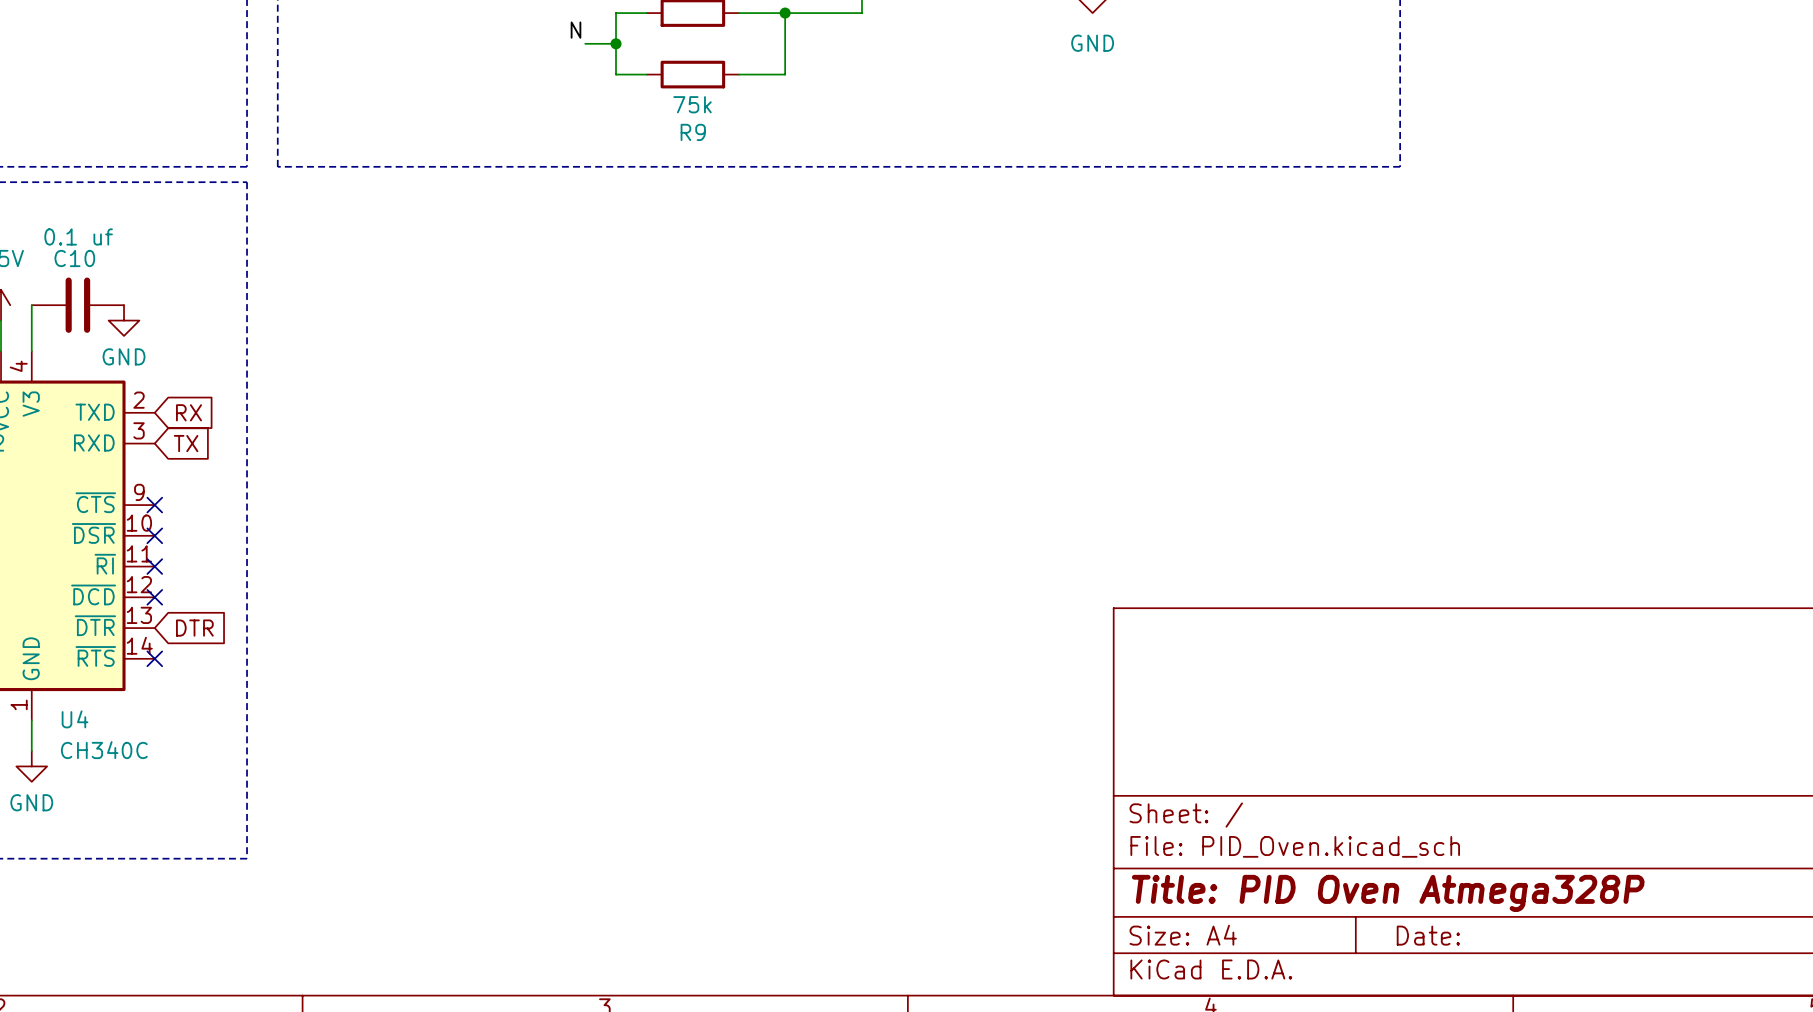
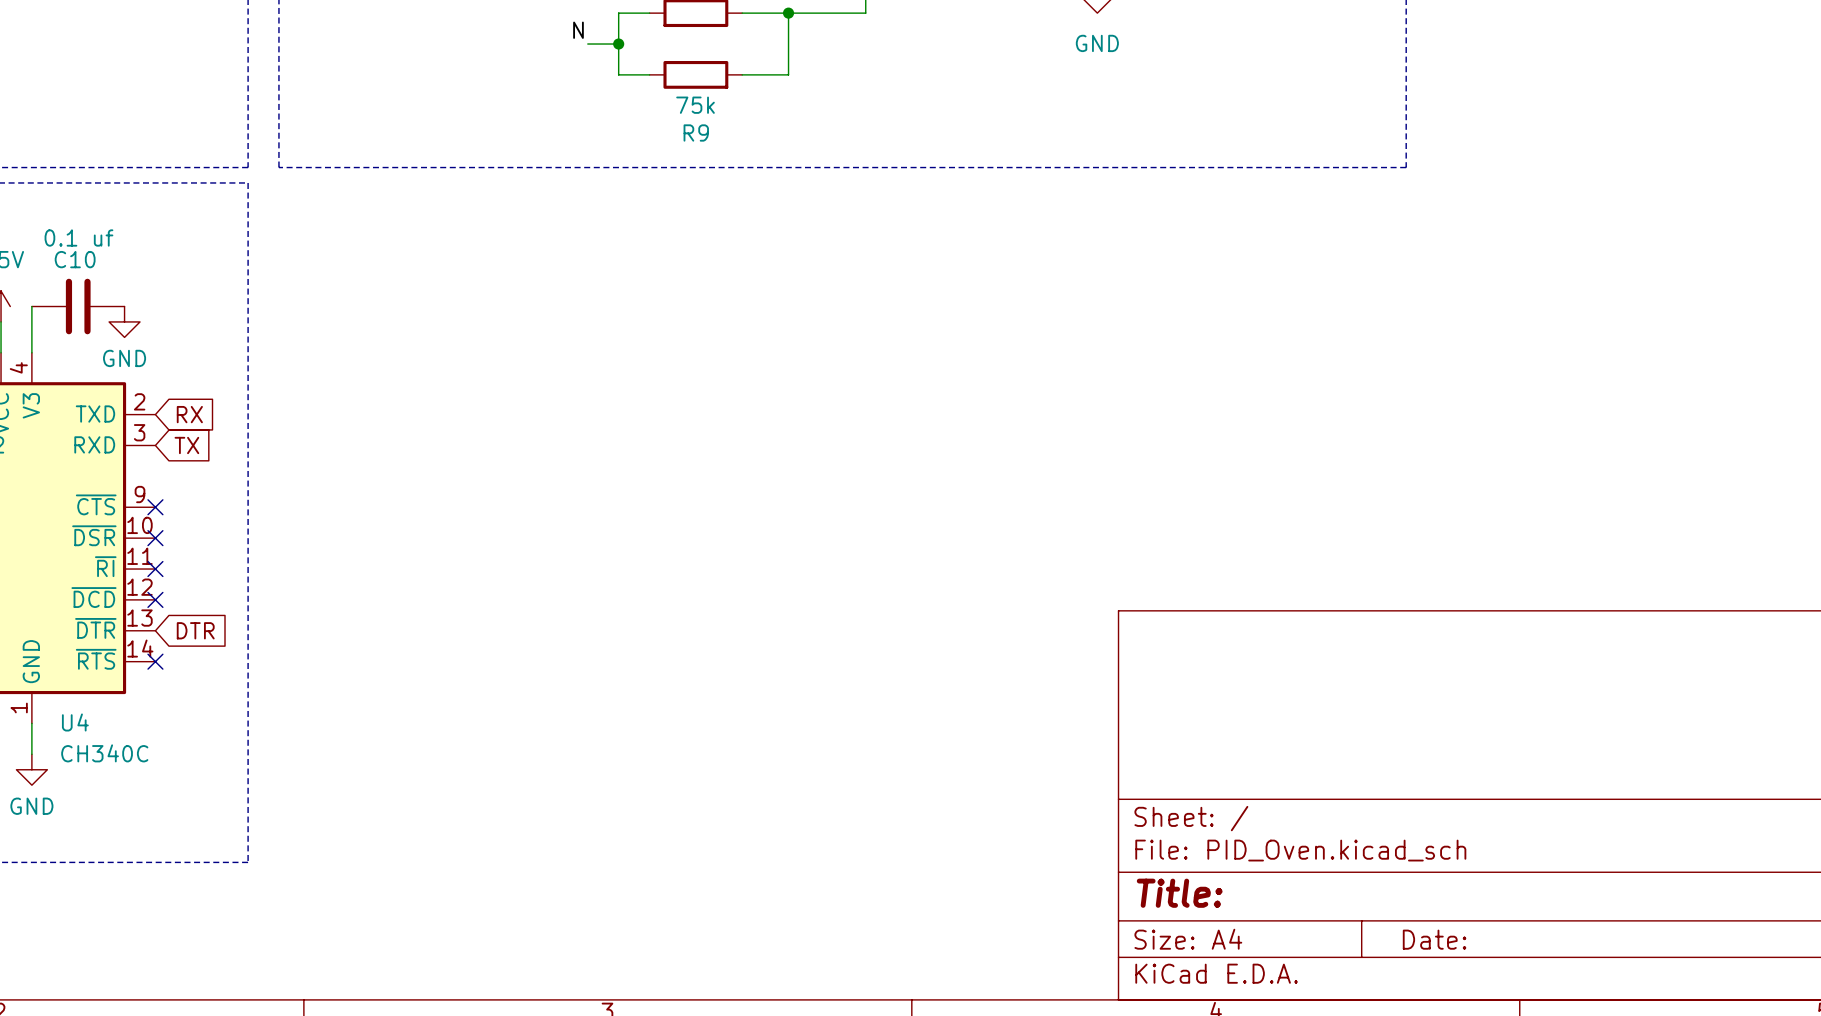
title block: Title: PID Oven Atmega328P (1388, 893) -> Title: (1179, 893)

